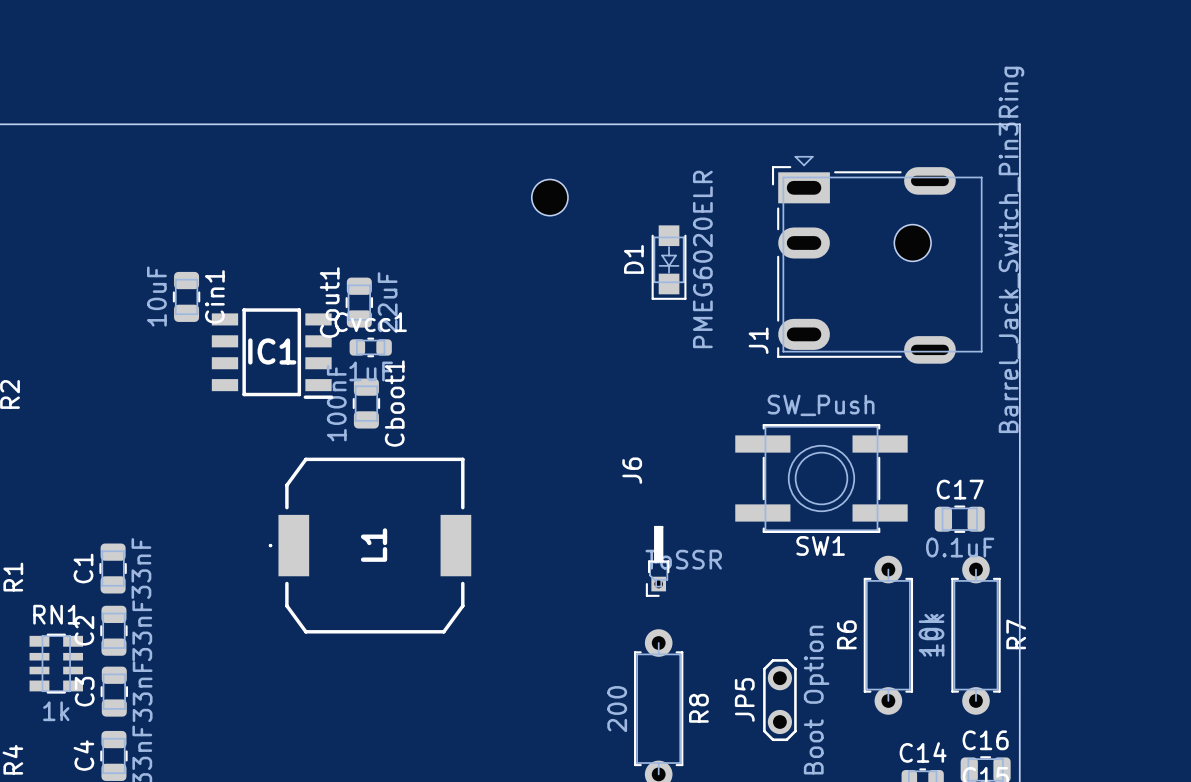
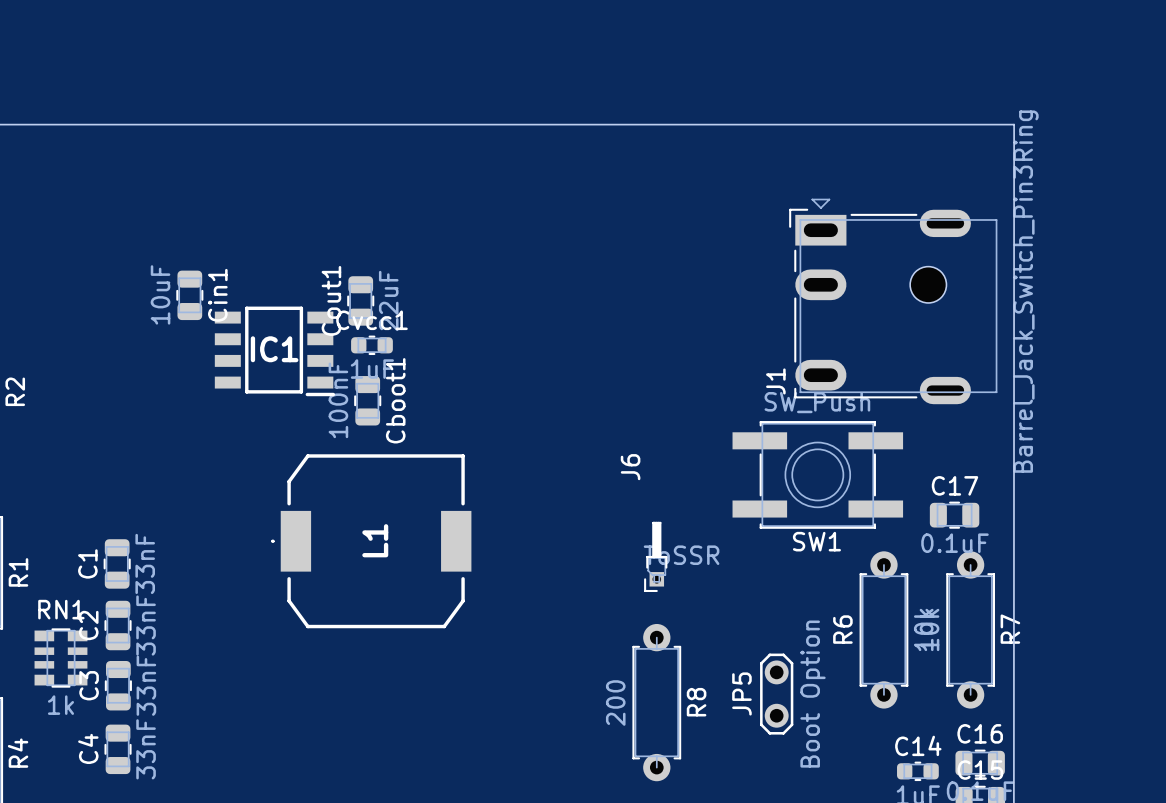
part: (549, 197) -> none
J1 position: (877, 259) -> (893, 301)
D1: PMEG6020ELR (669, 262) -> none

